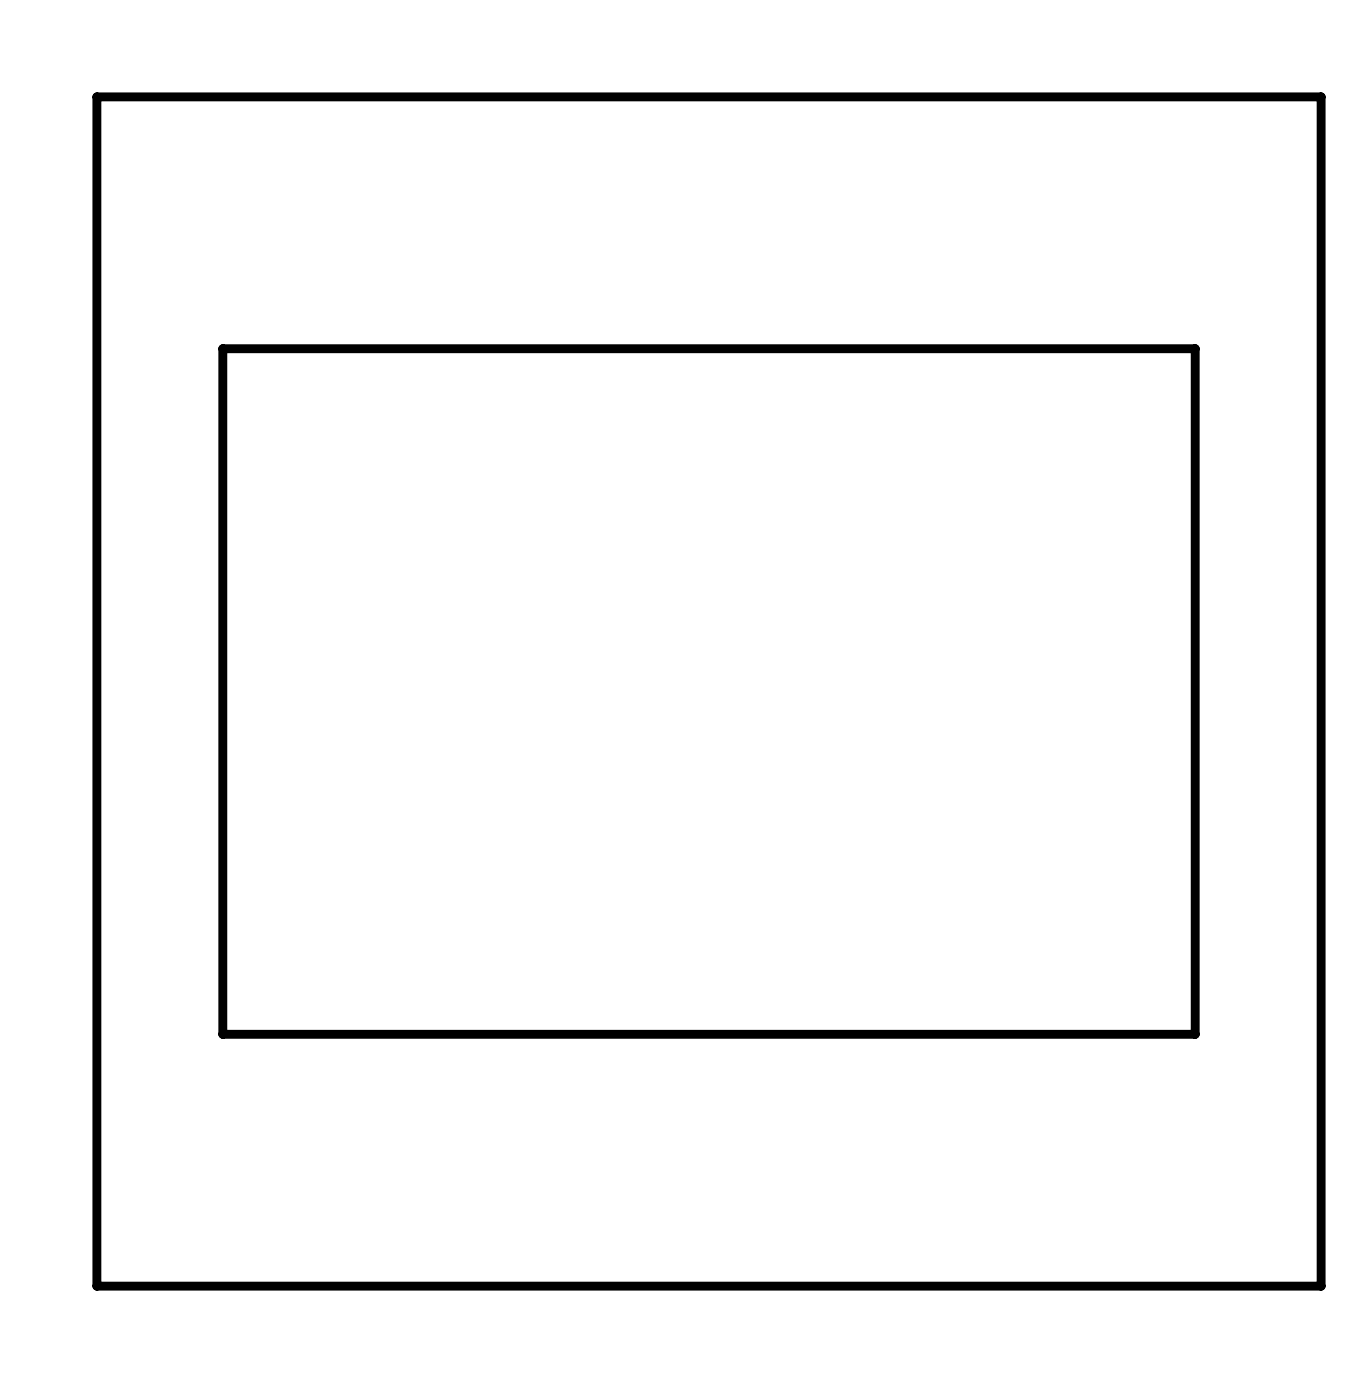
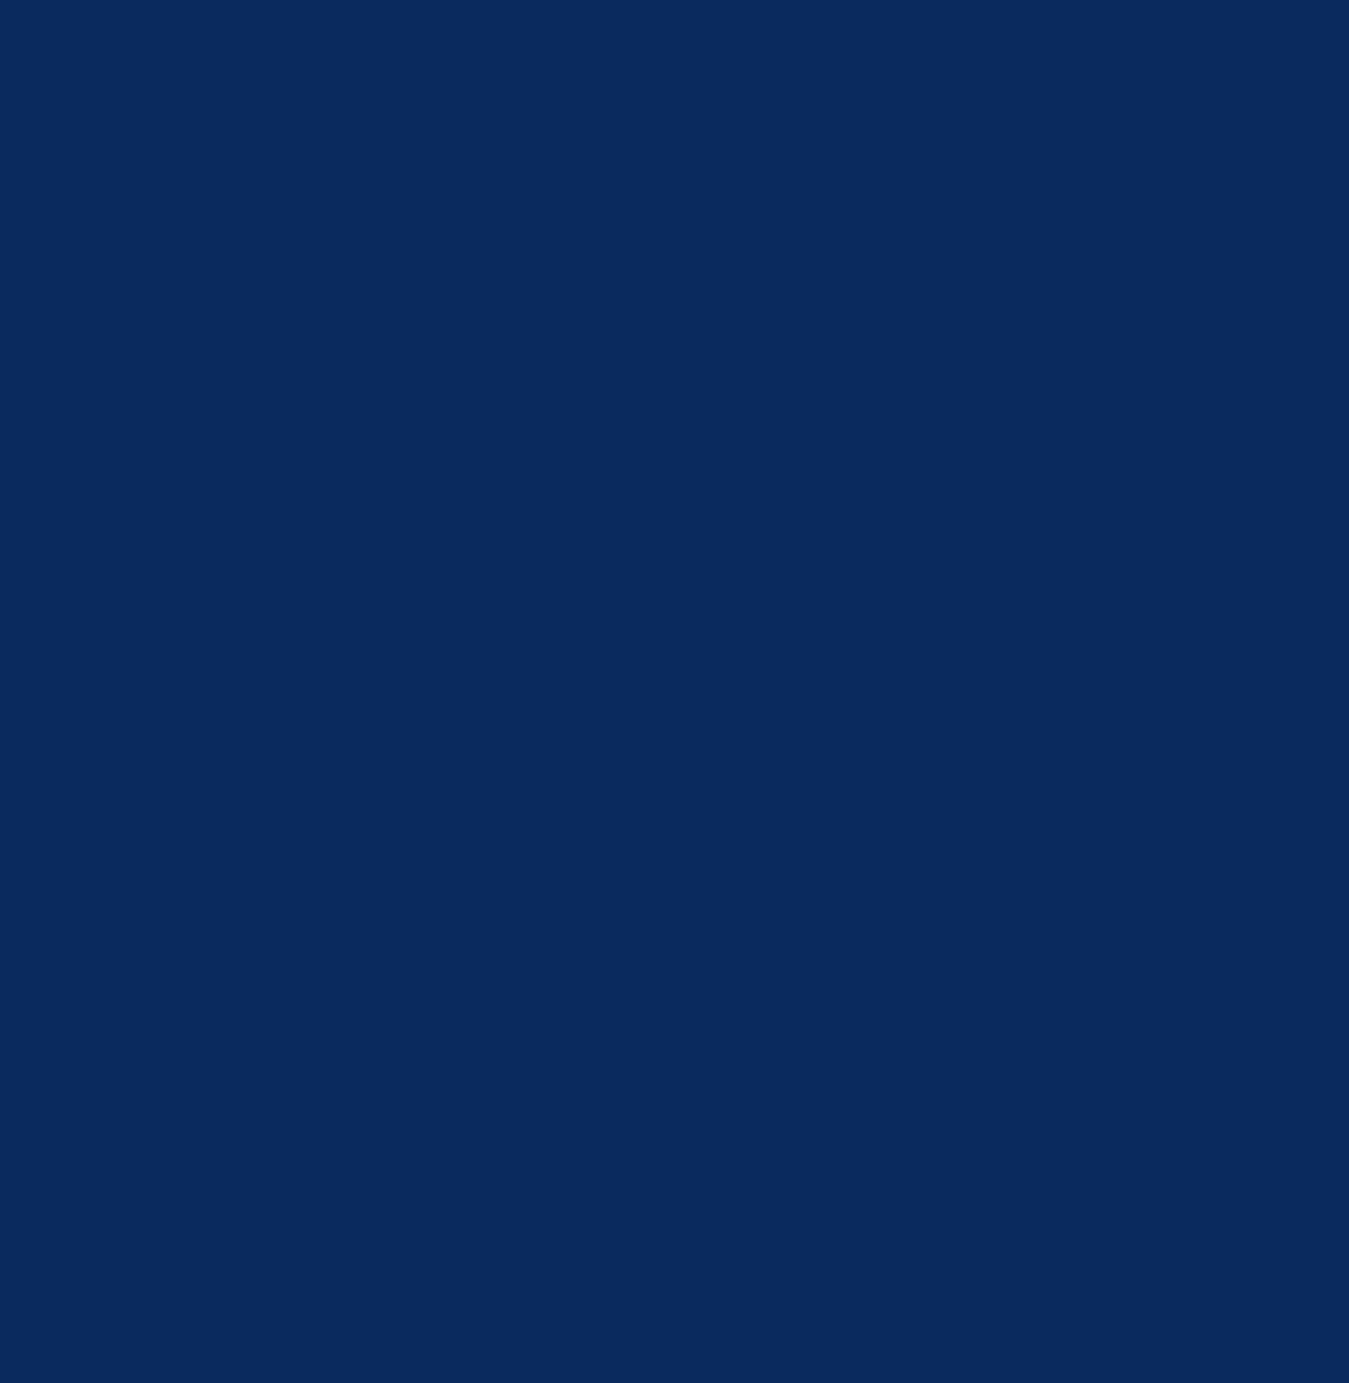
board edge: (1321, 96) (96, 96) (96, 1286) (1321, 1286) (1321, 96) -> none
board edge: (1195, 348) (1195, 1034) (222, 1034) (222, 348) (1195, 348) -> none

